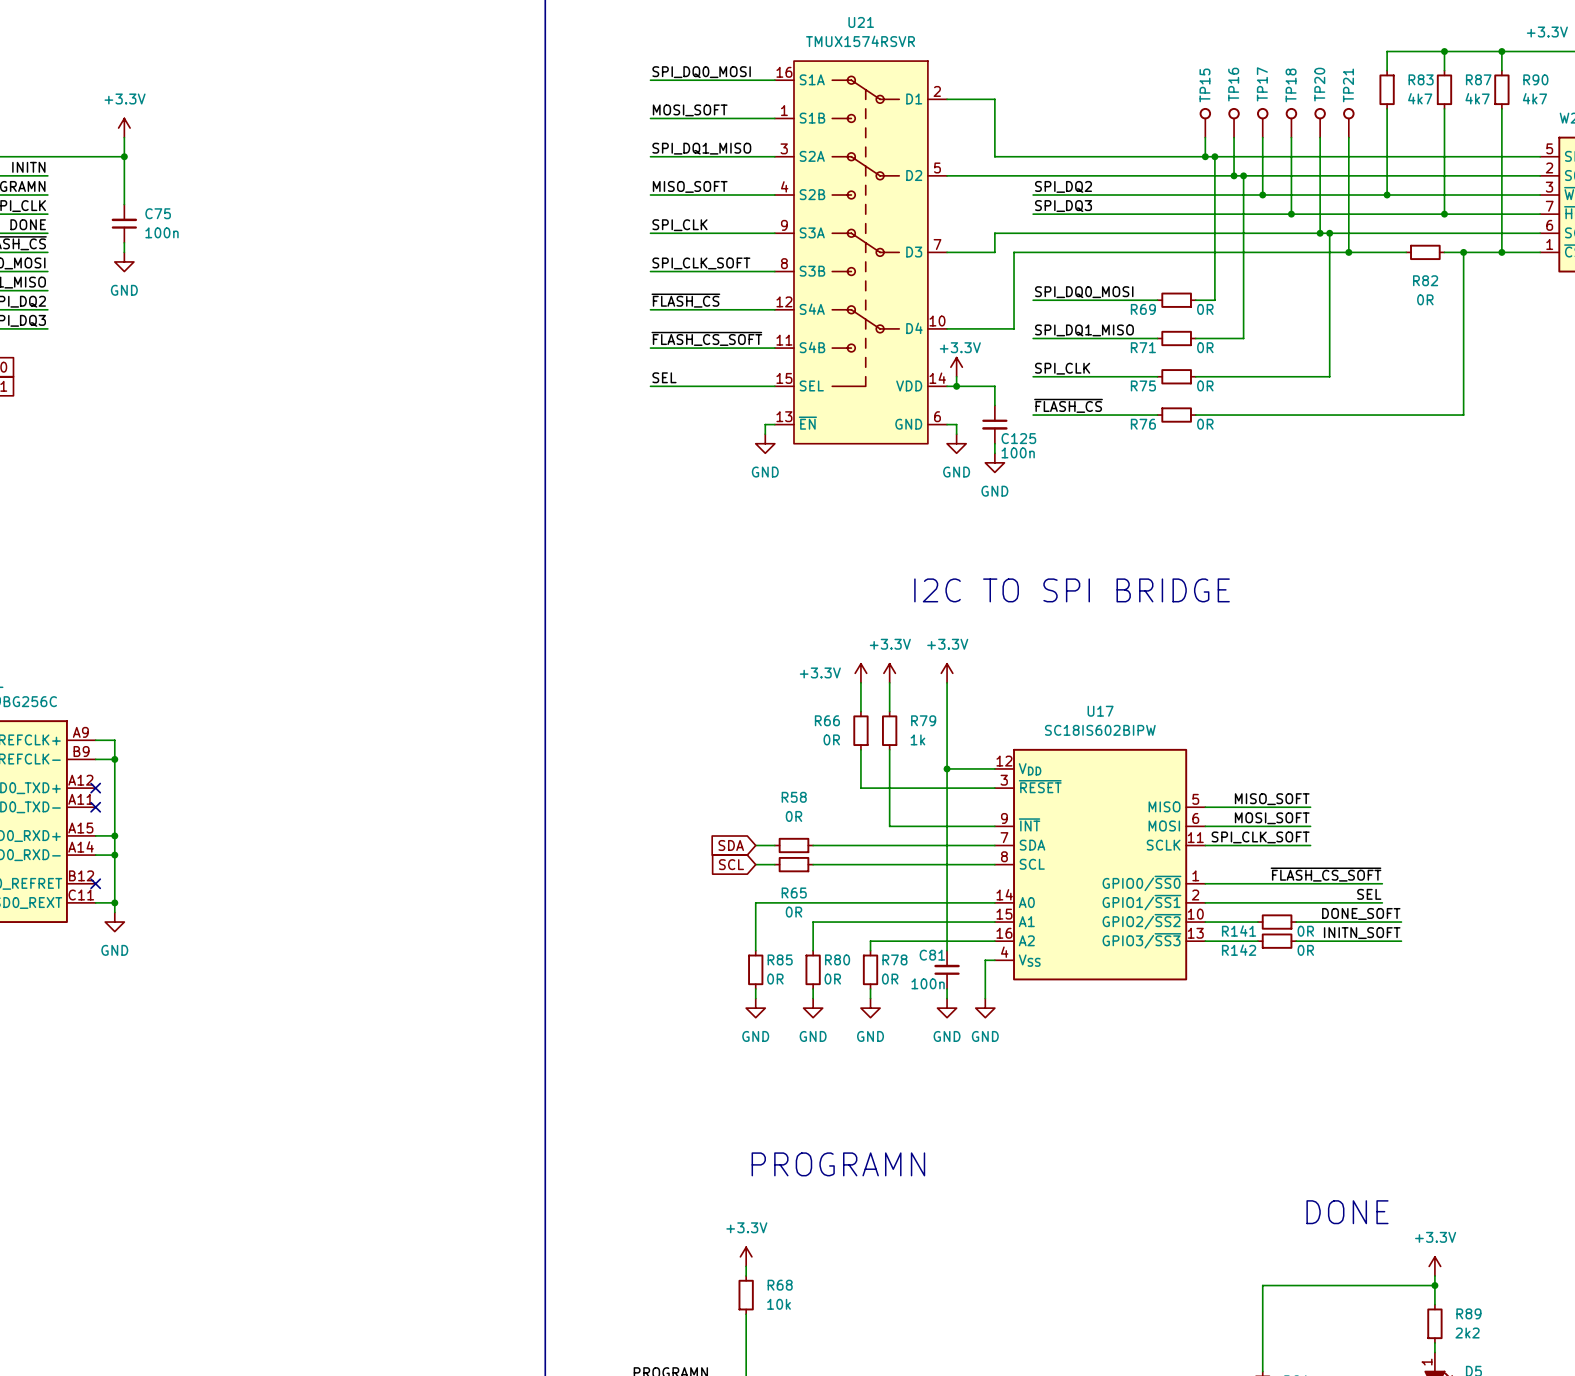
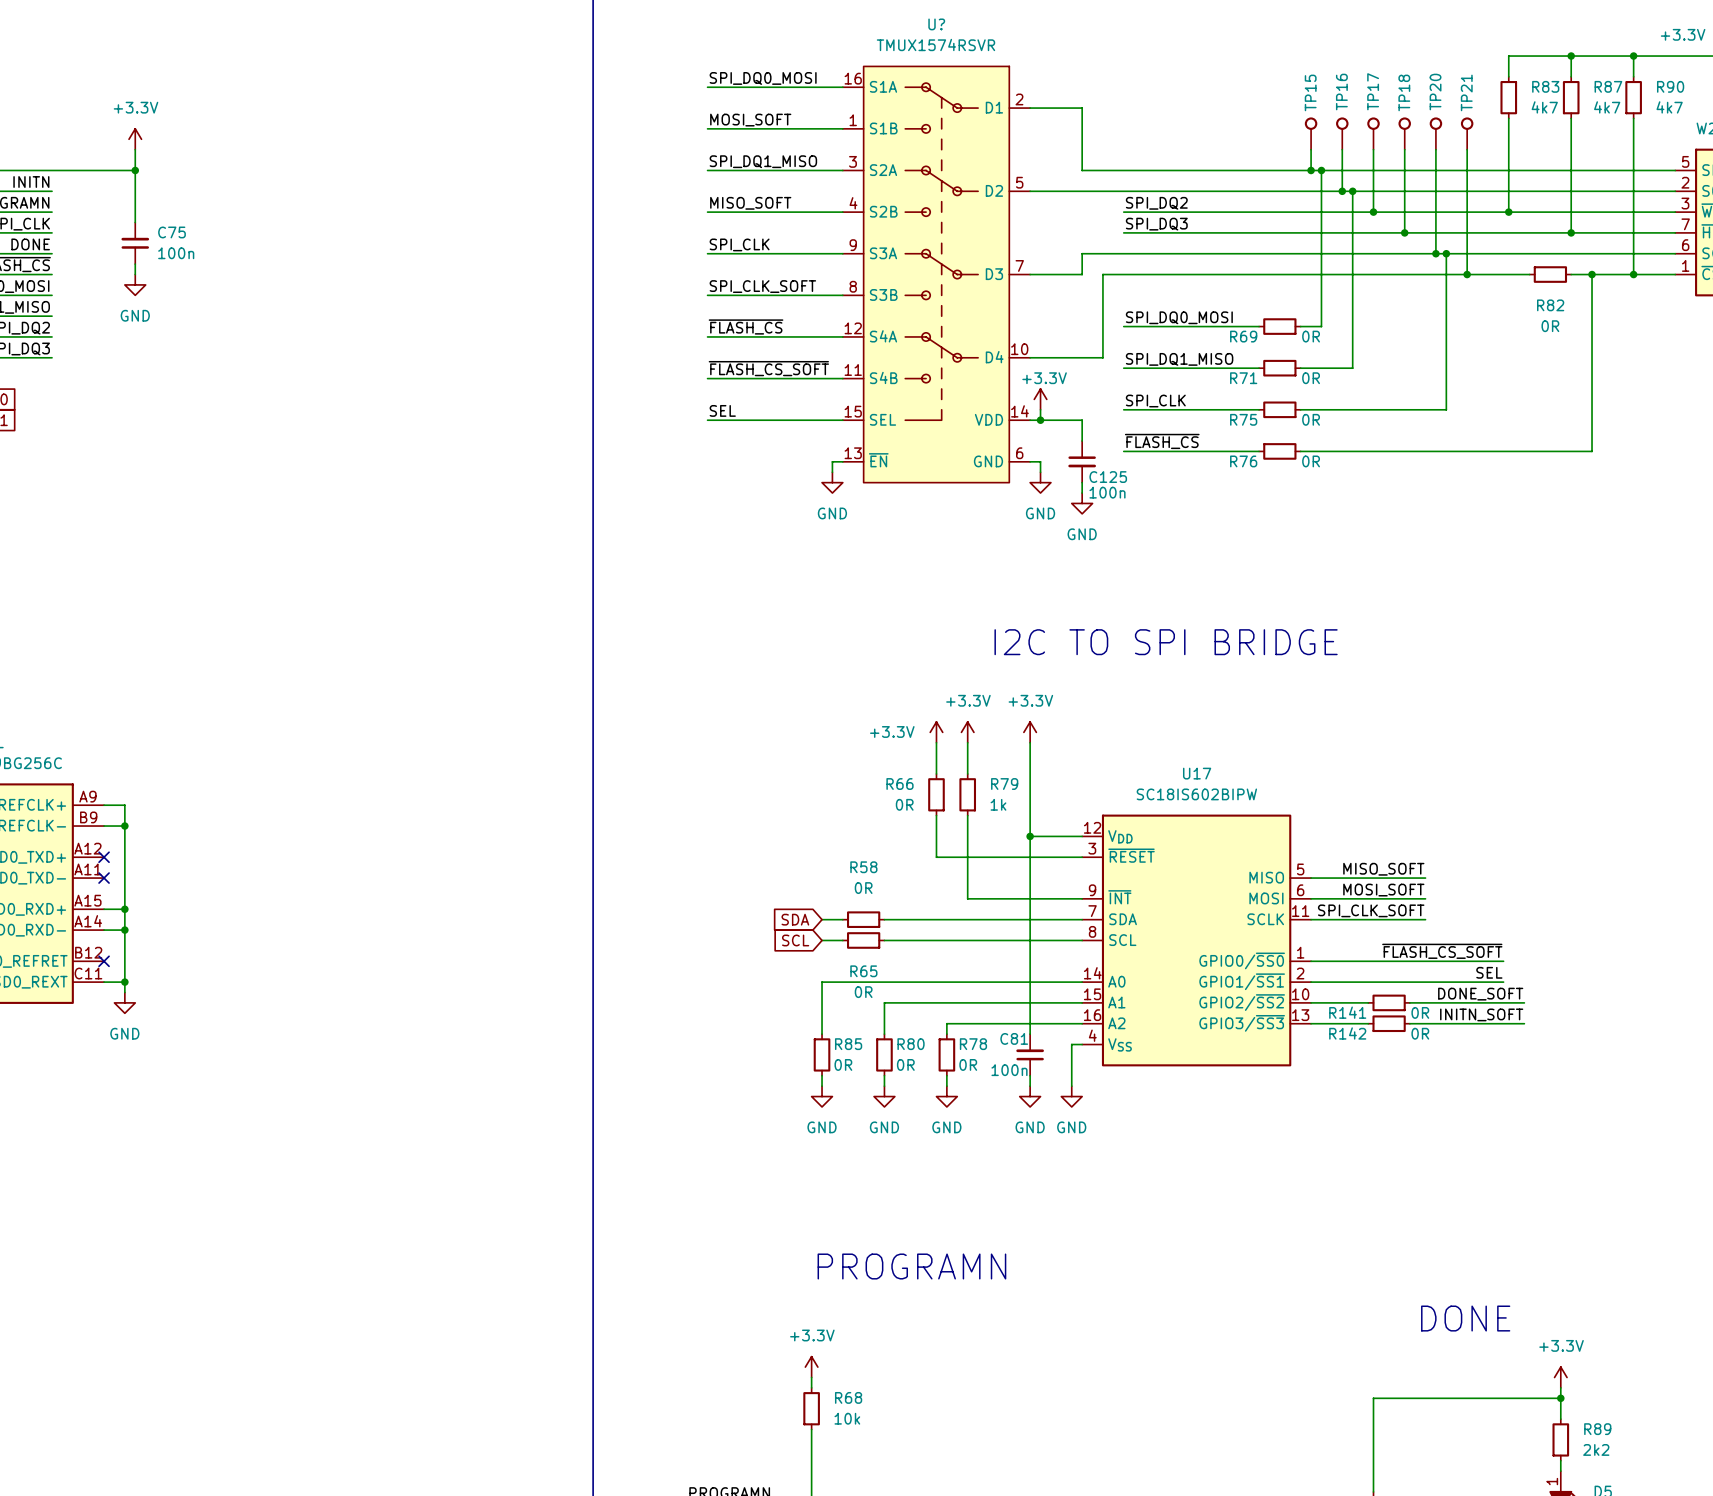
U21 name: U21 (861, 22) -> U? (936, 24)

